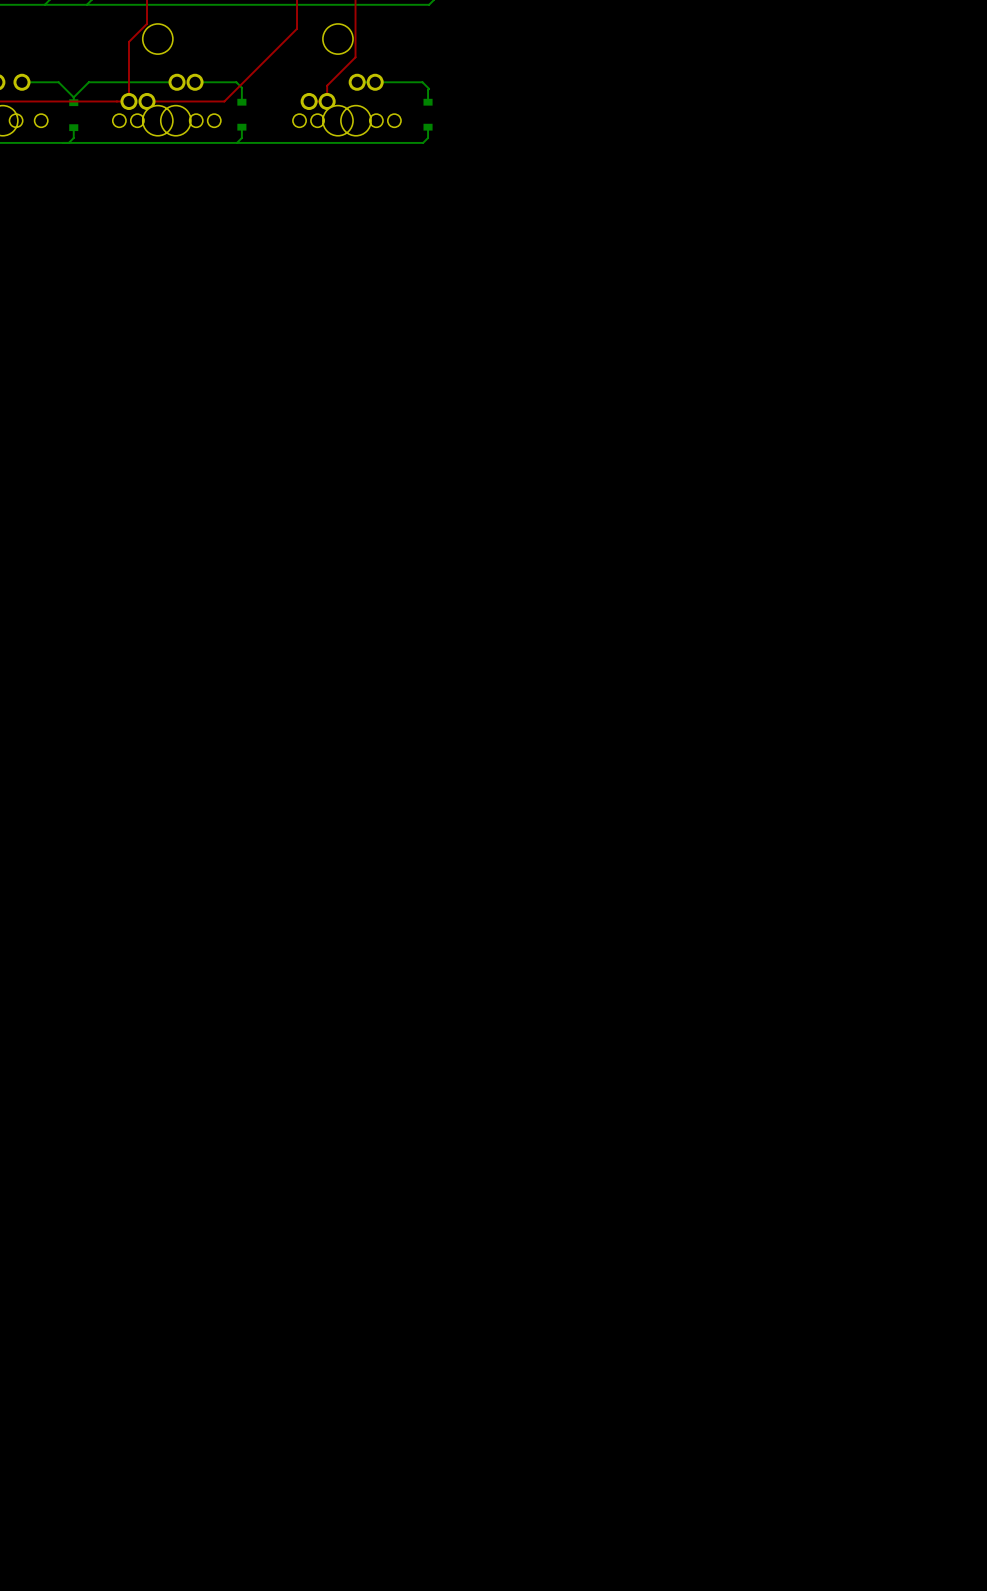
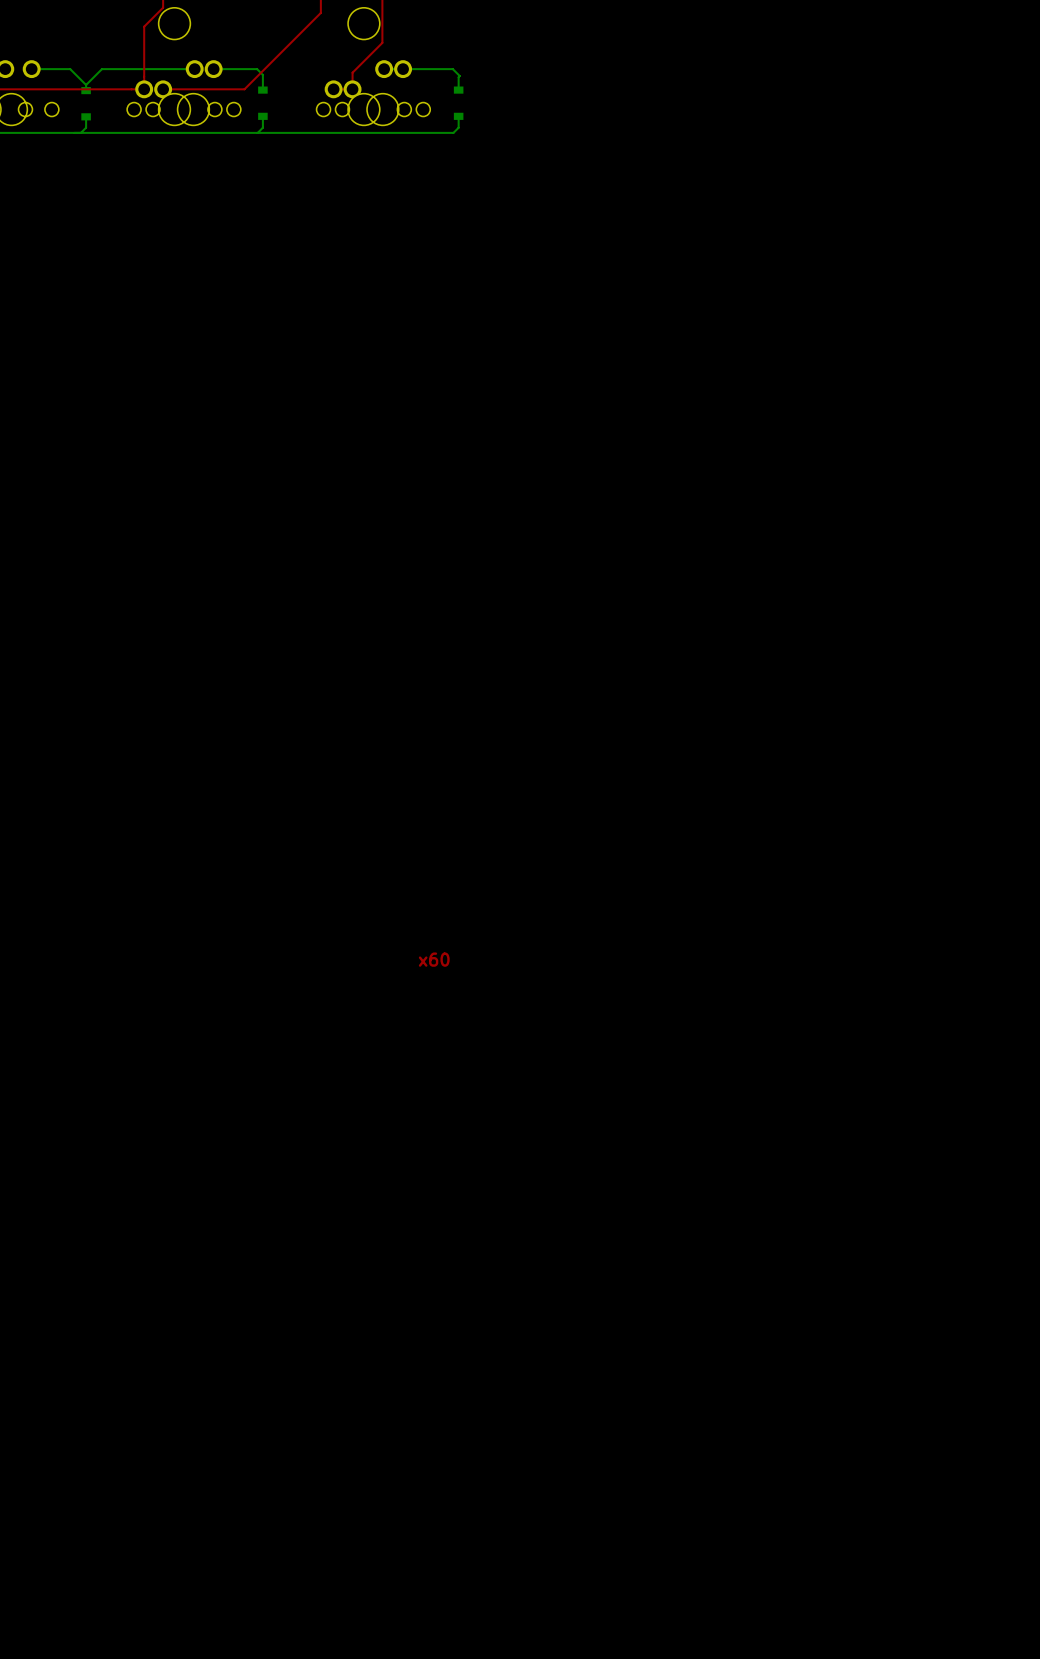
text: none -> x60 (434, 959)

